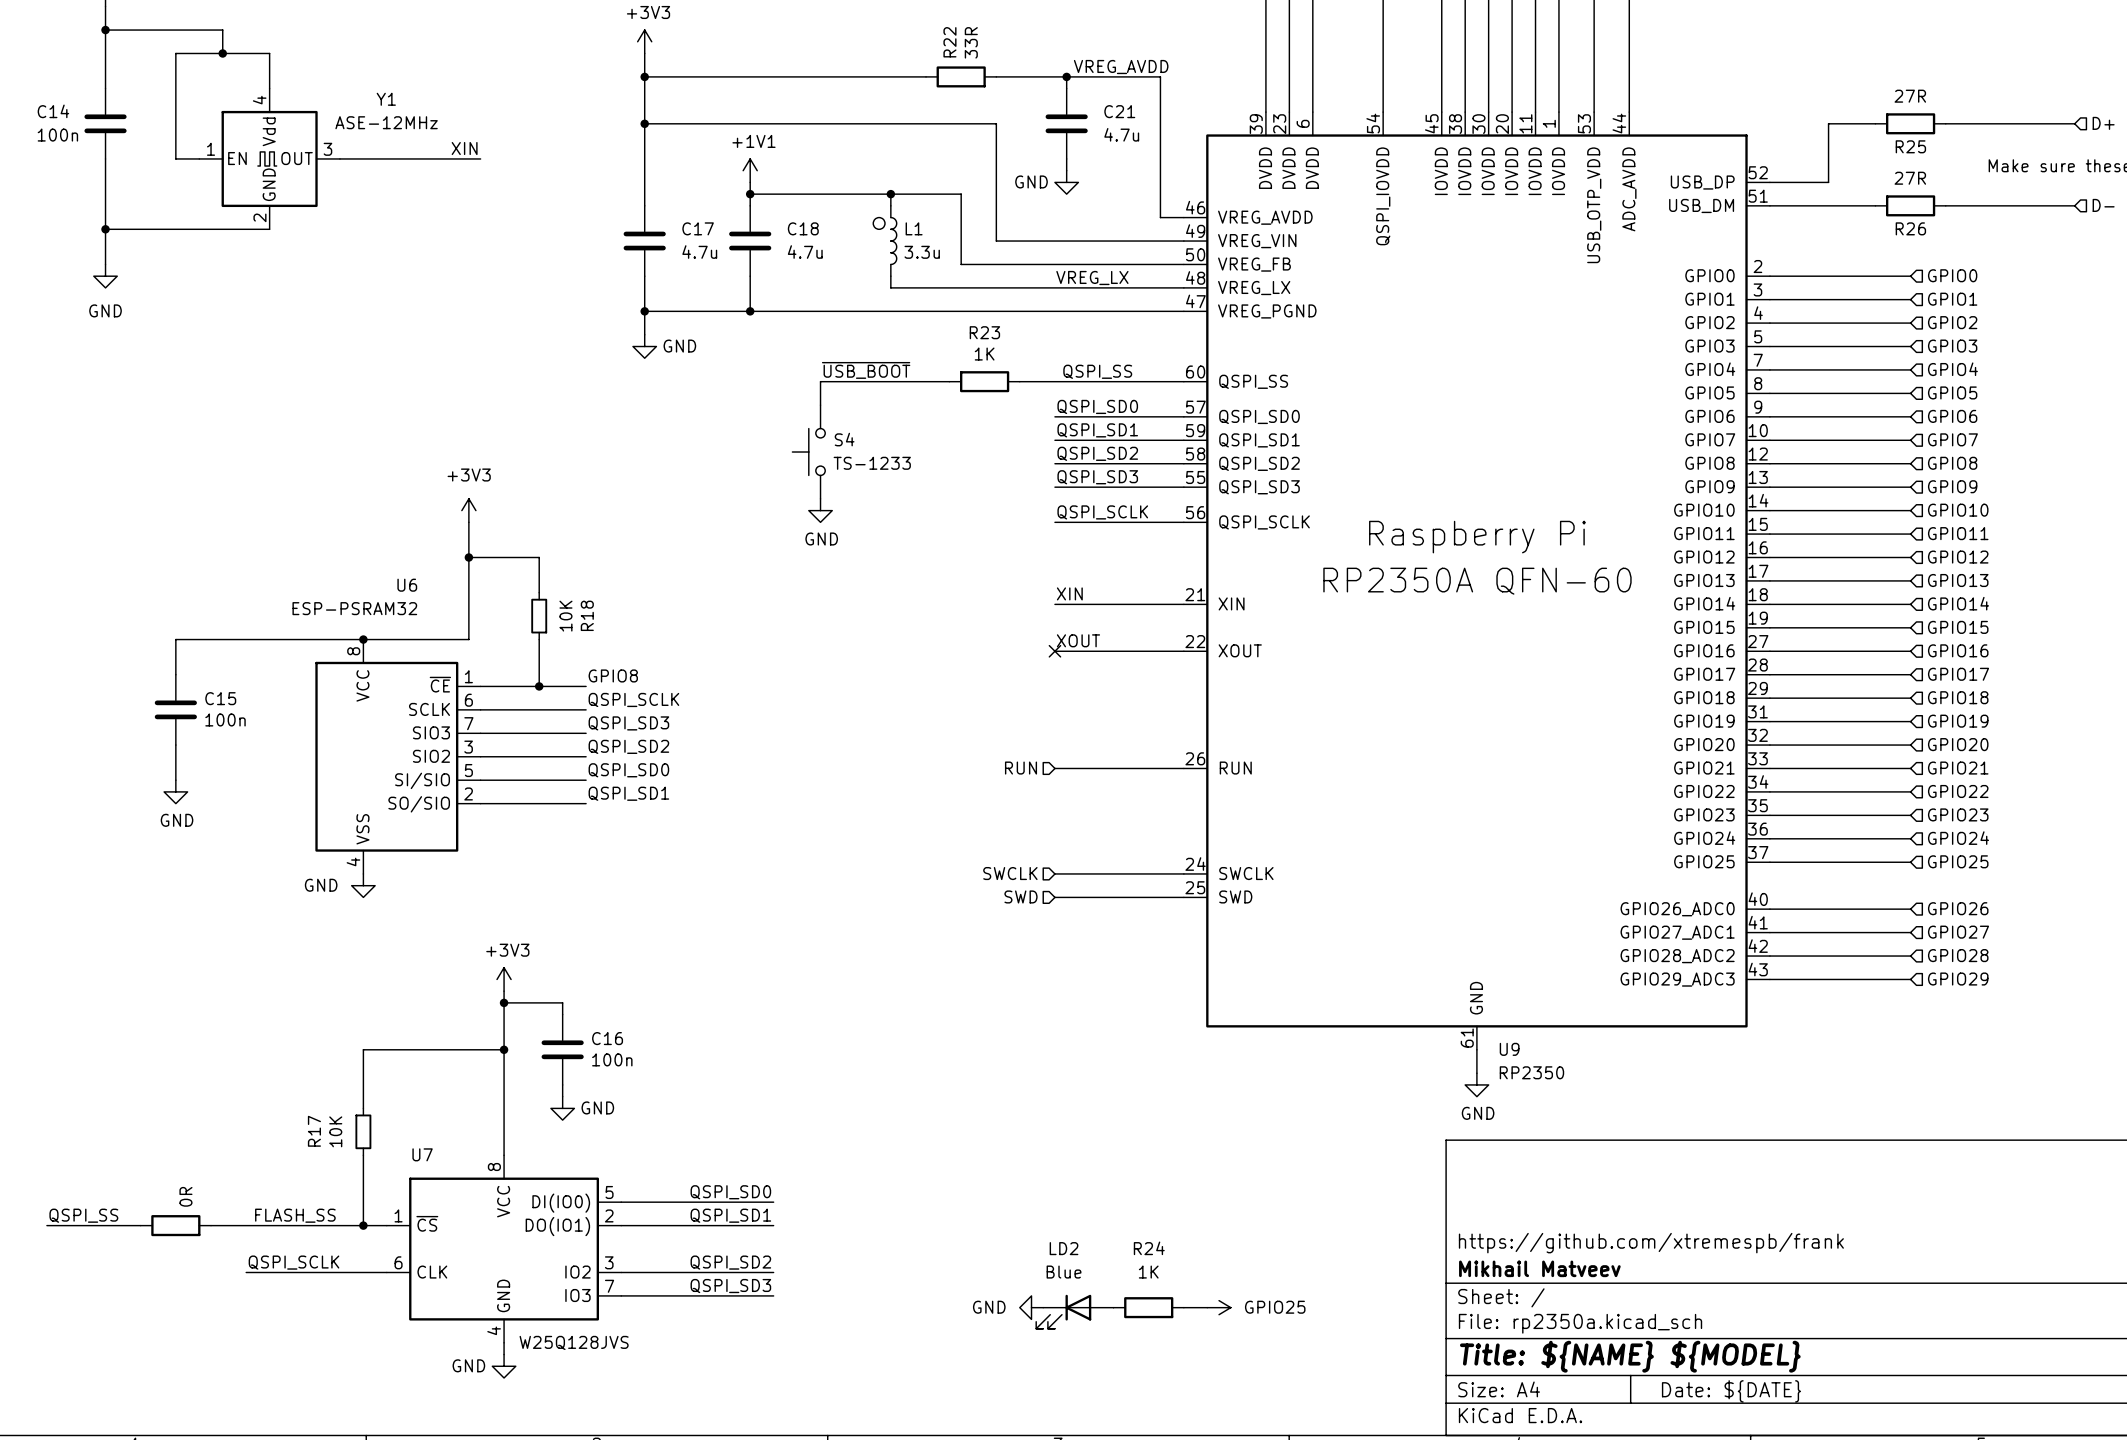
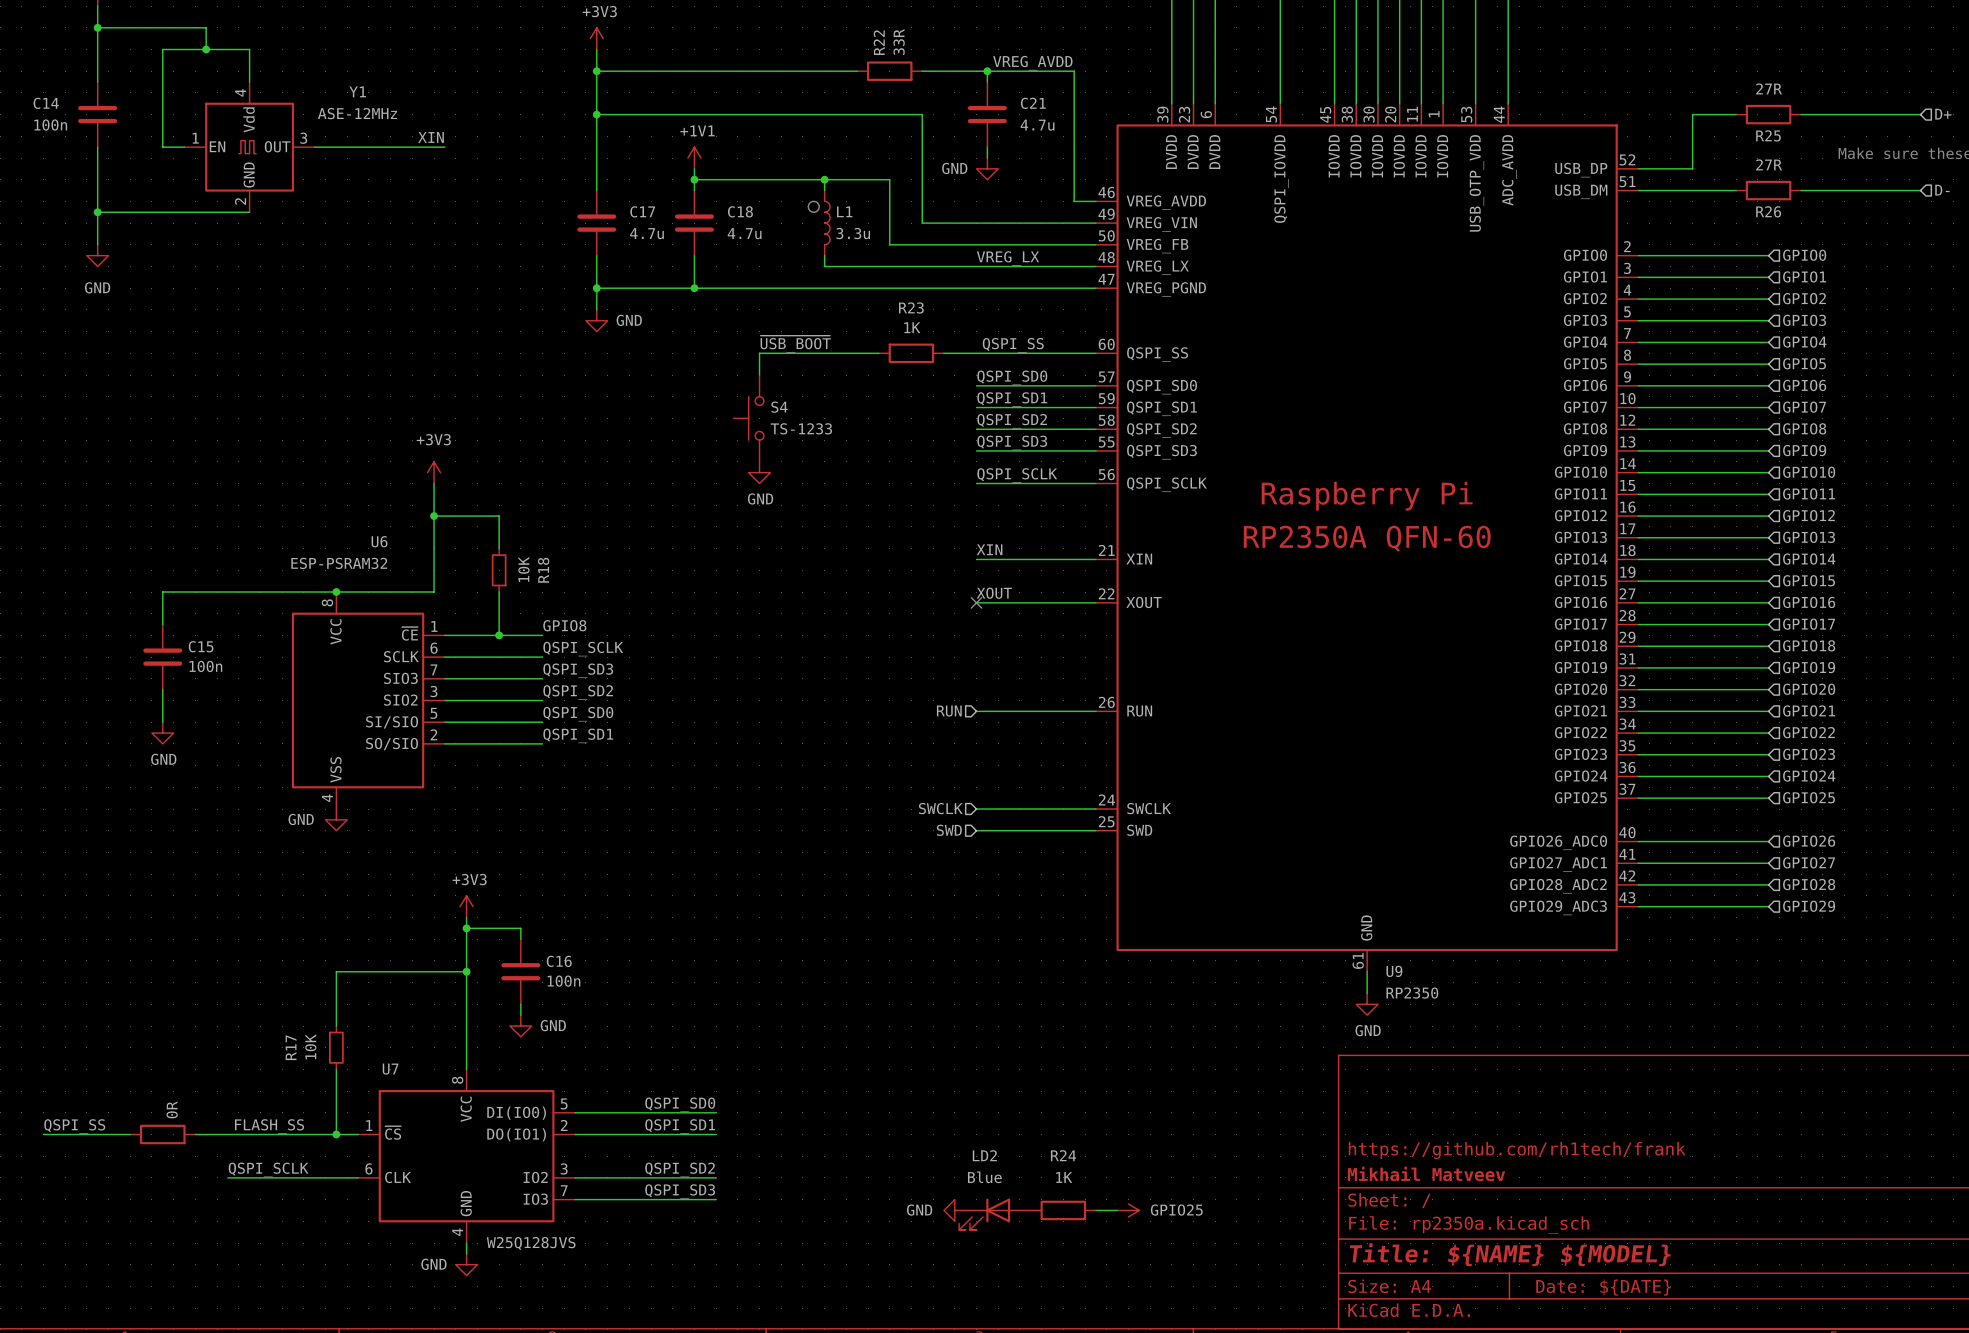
title block: https://github.com/xtremespb/frank (1651, 1243) -> https://github.com/rh1tech/frank (1517, 1150)

